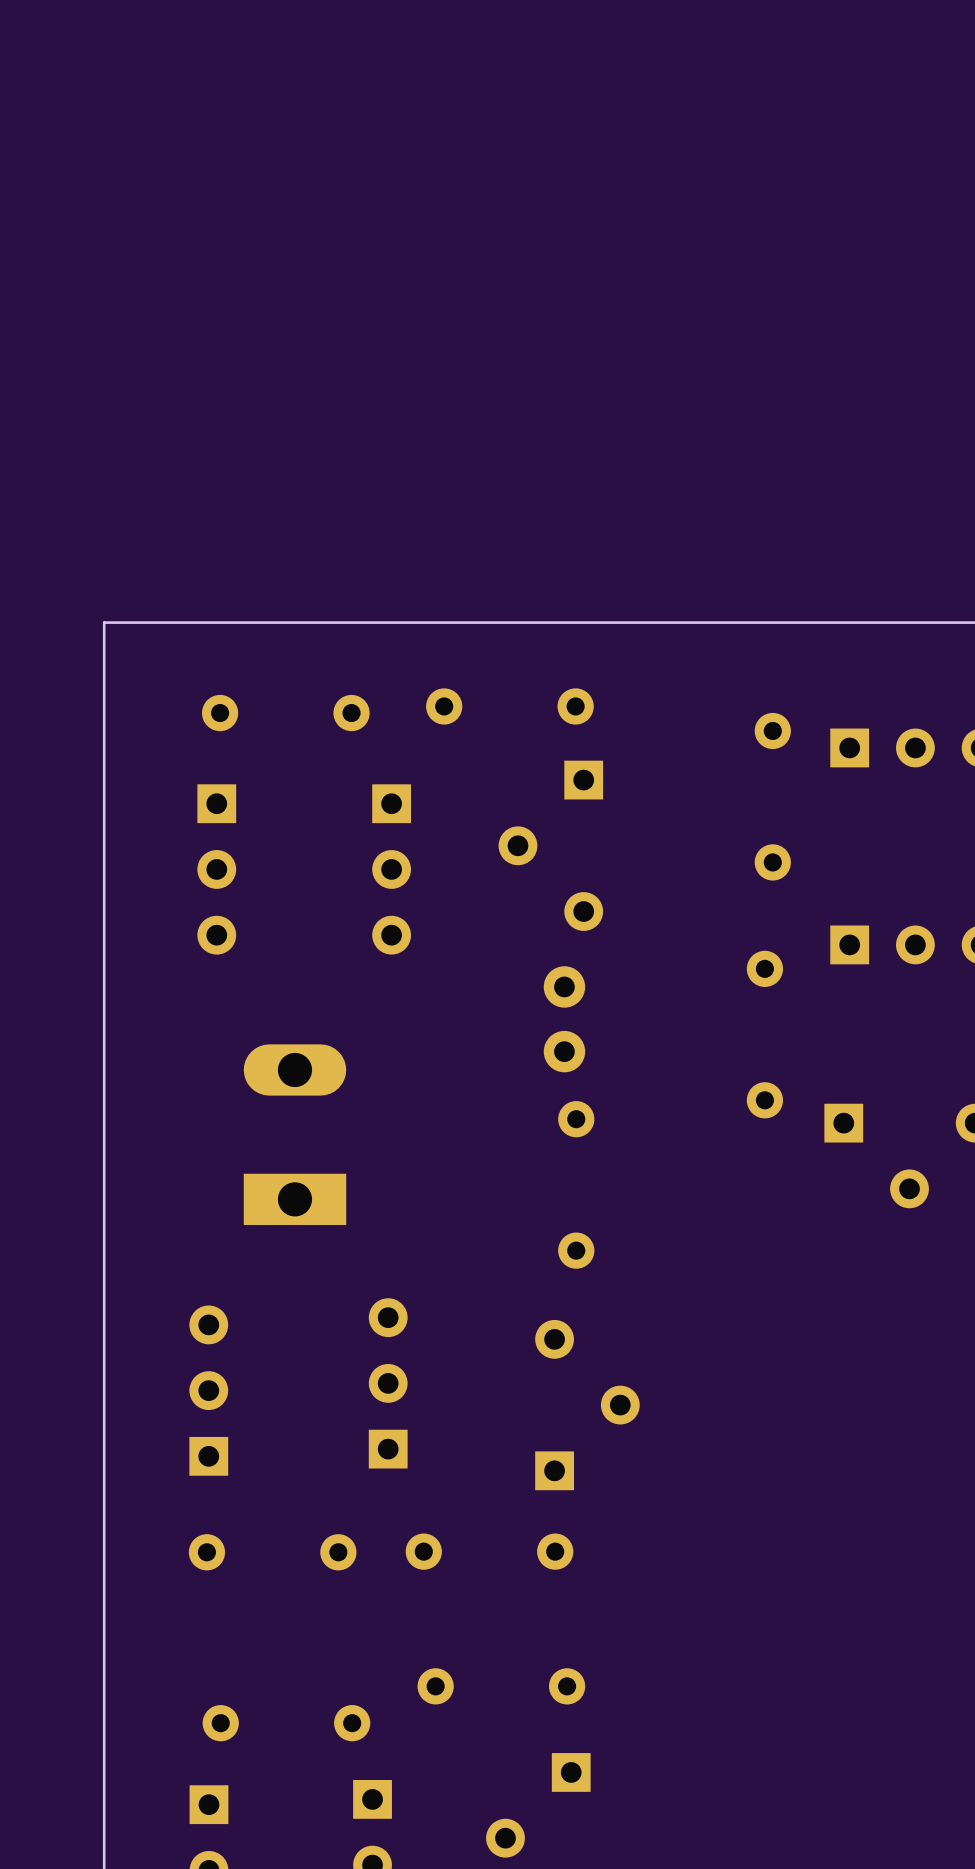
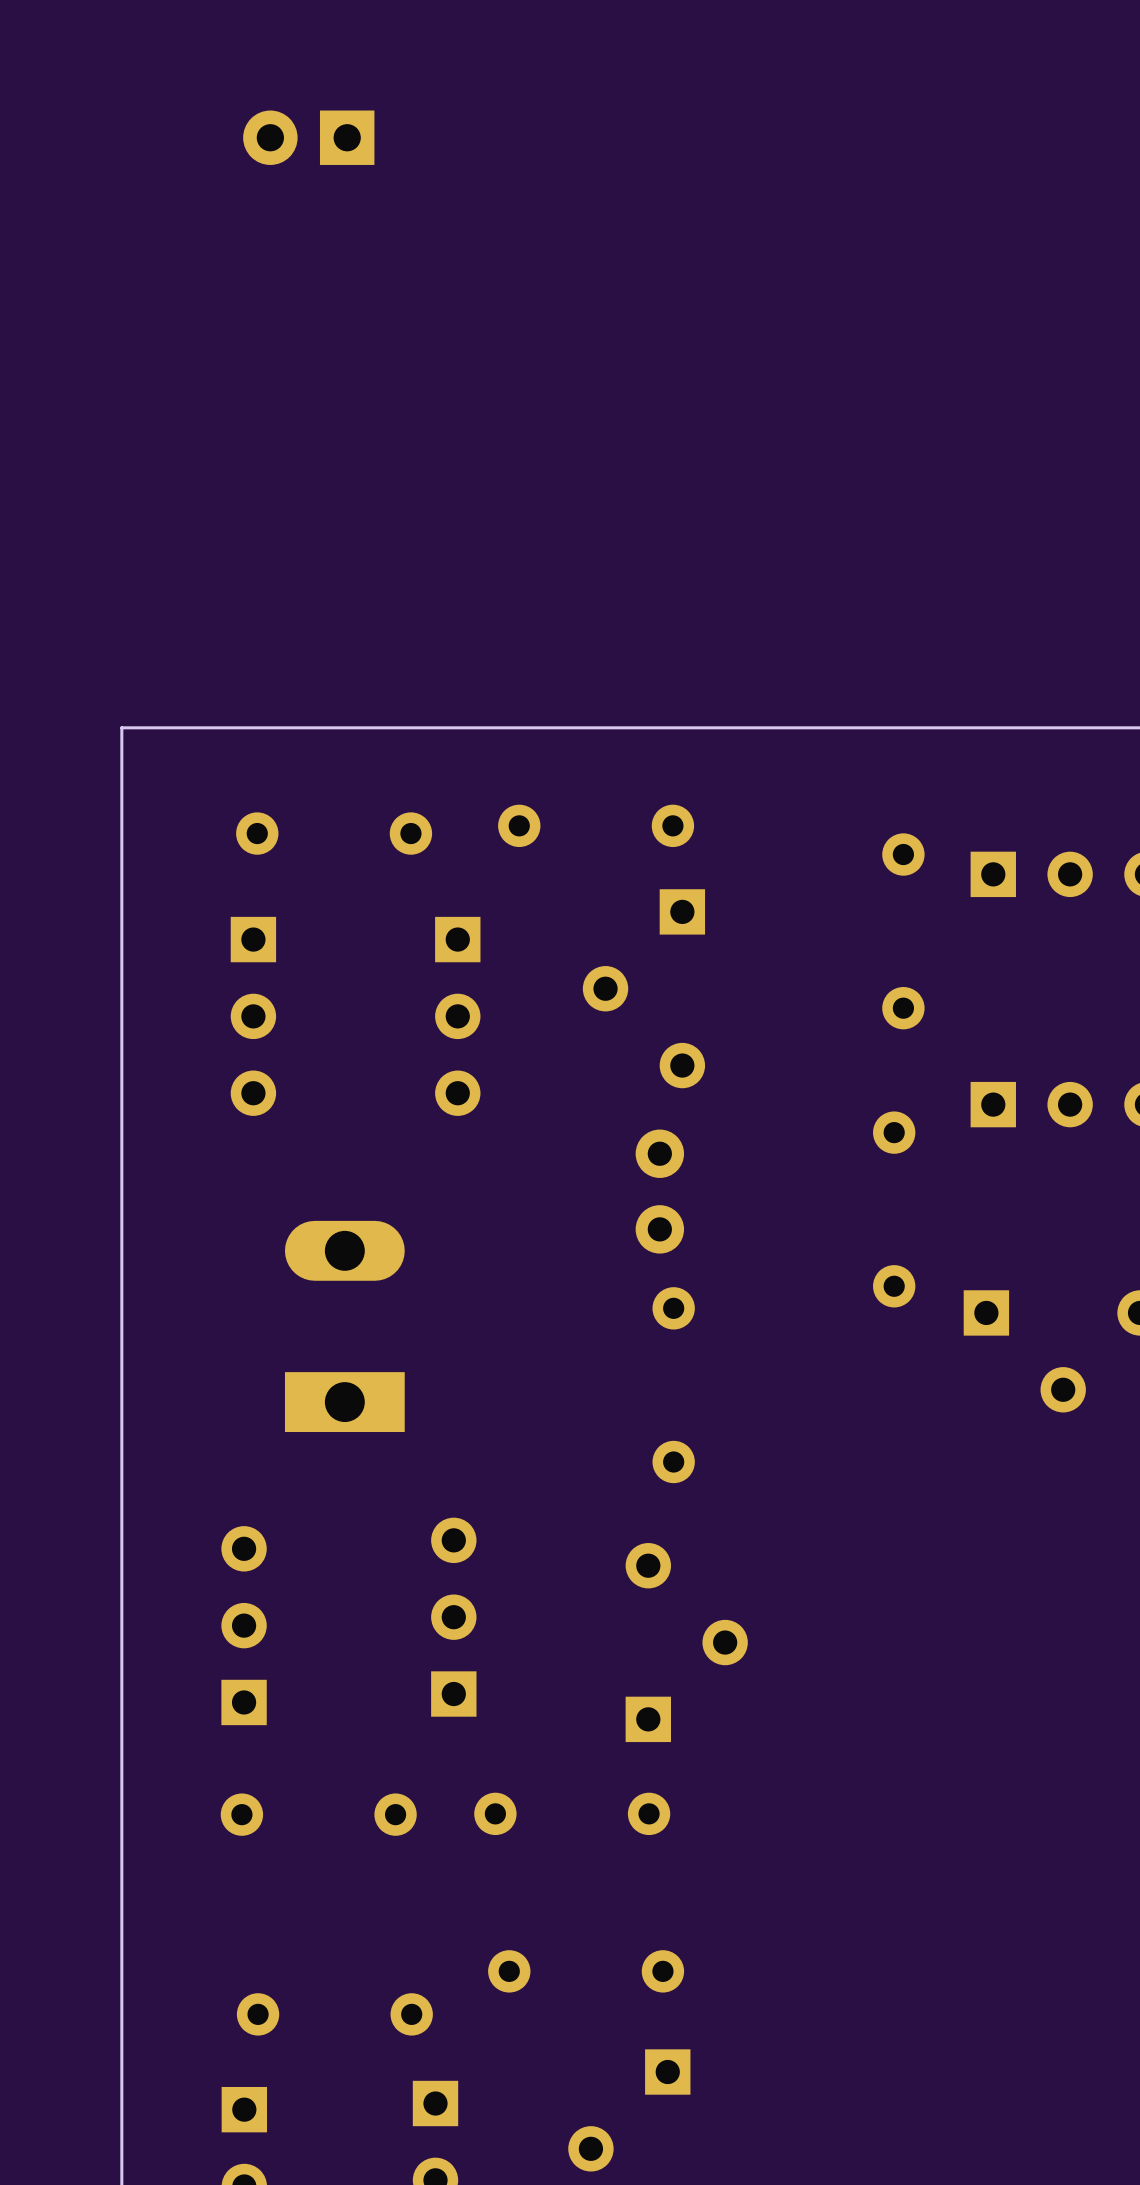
part: none -> (308, 137)

